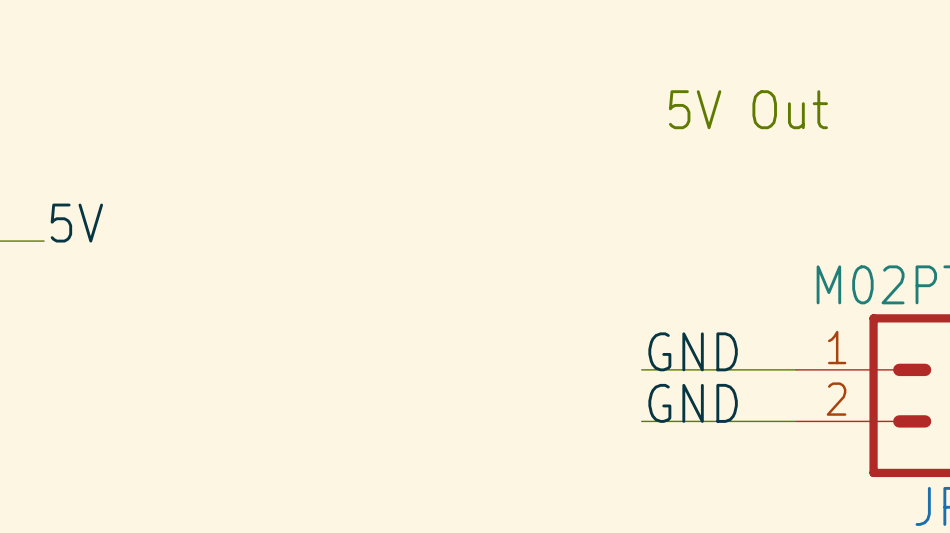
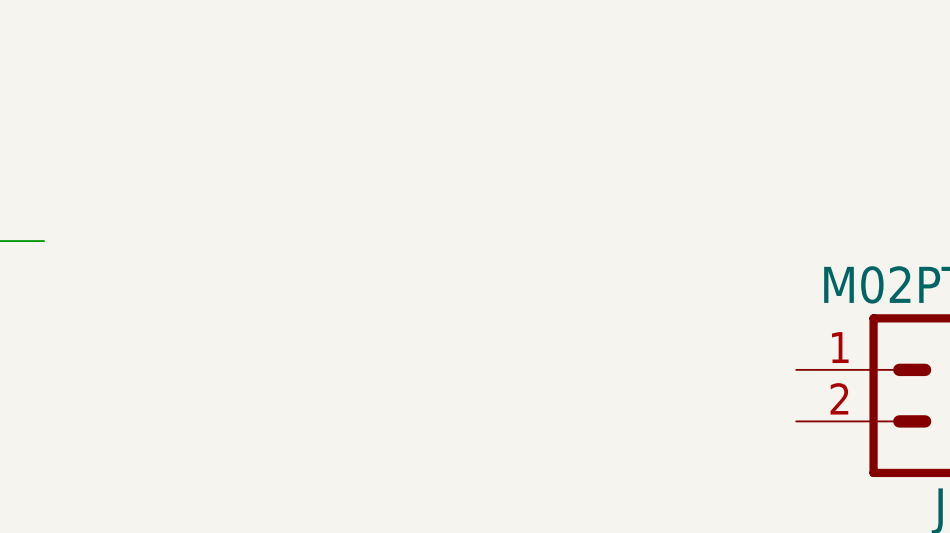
text: 5V Out (748, 109) -> none
label: 5V (76, 223) -> none
label: GND (693, 351) -> none
wire: (641, 369) (796, 369) -> none
label: GND (693, 403) -> none
wire: (641, 421) (796, 421) -> none

